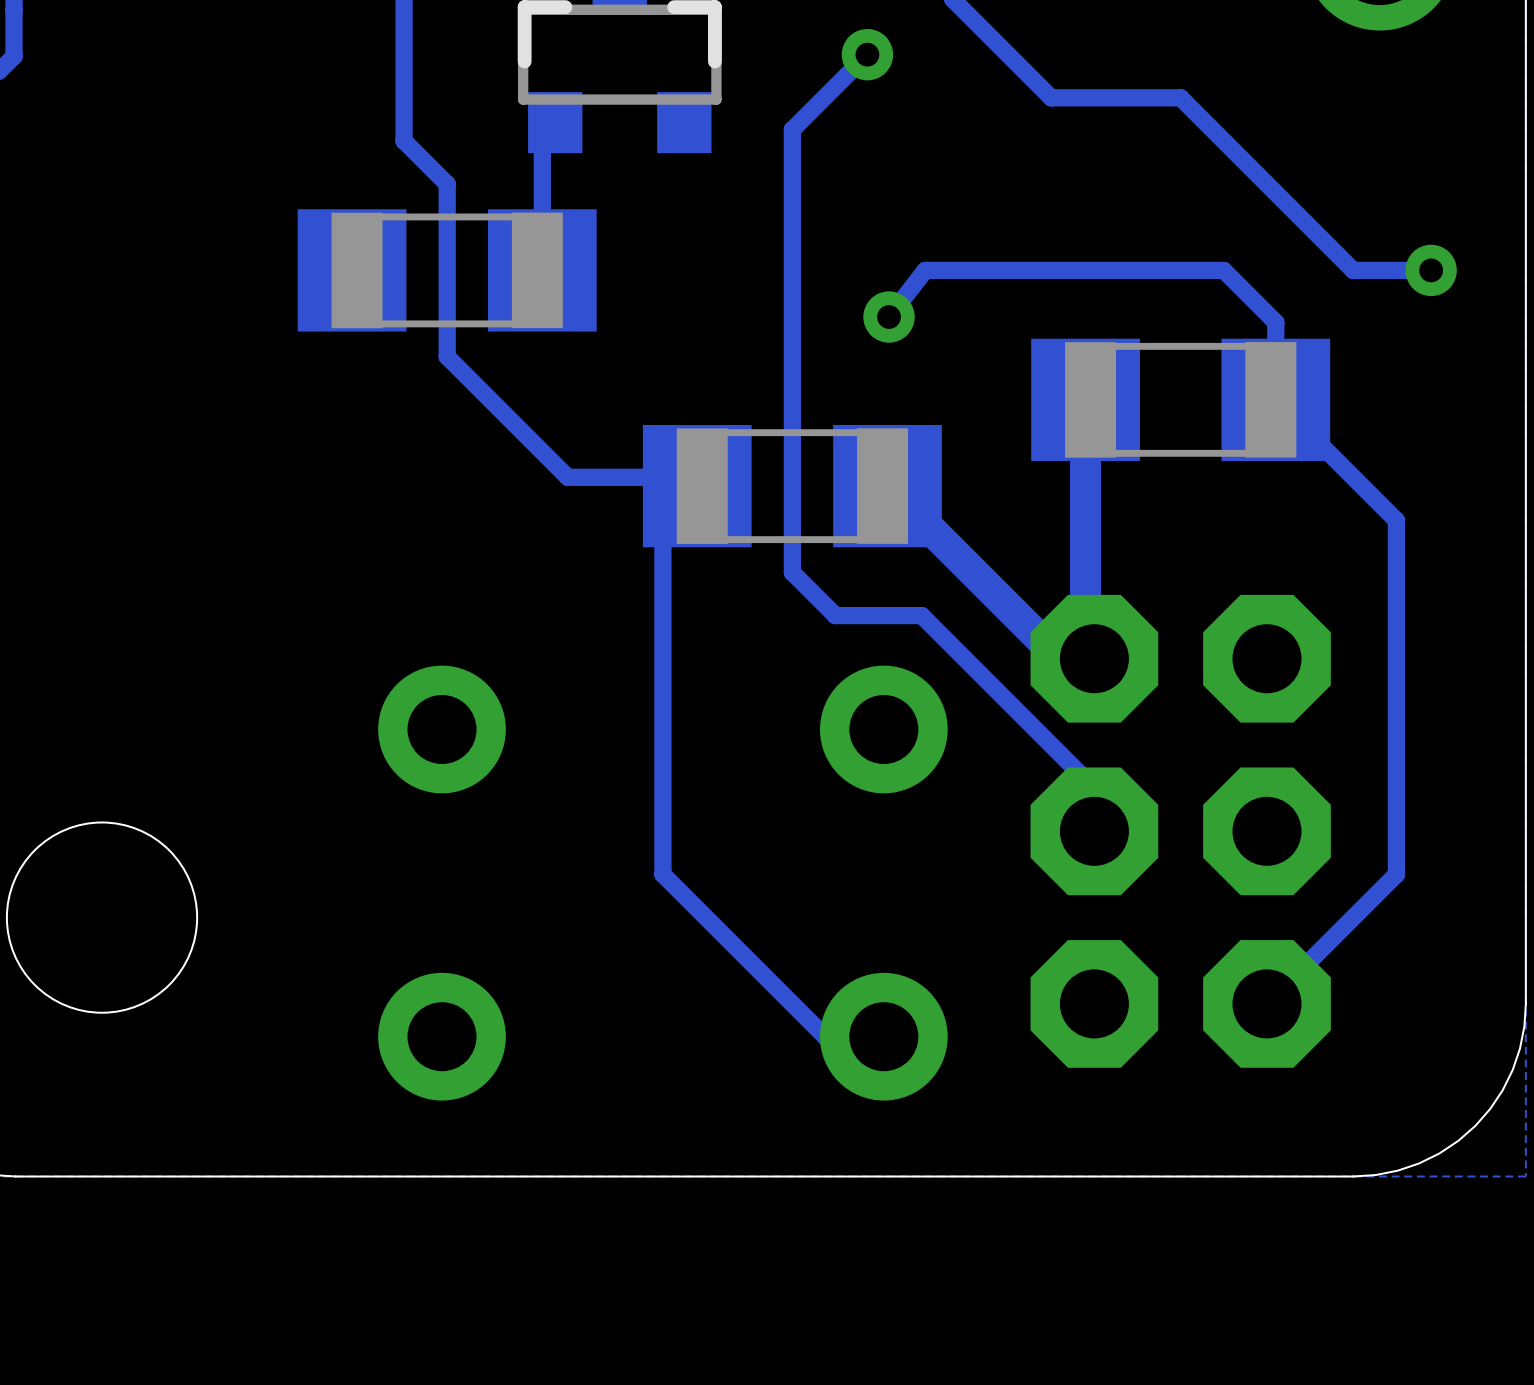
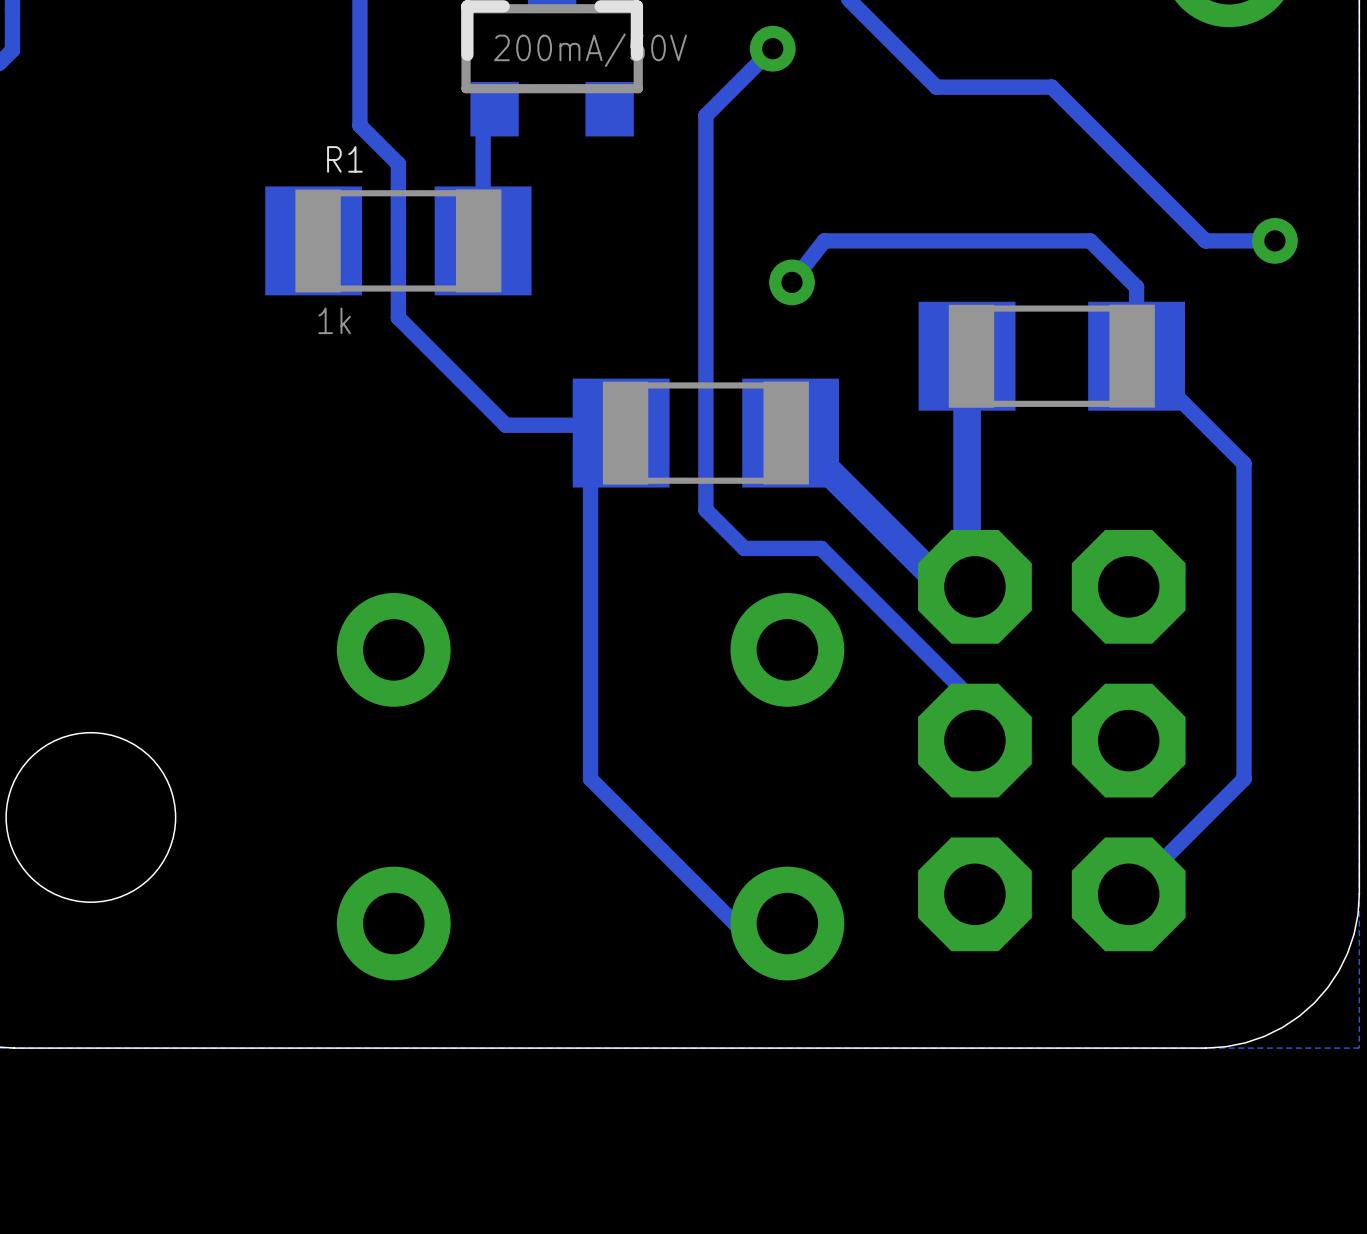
part value: none -> 200mA/50V (590, 50)
R1 name: none -> R1 (344, 159)
R1 value: none -> 1k (334, 320)

